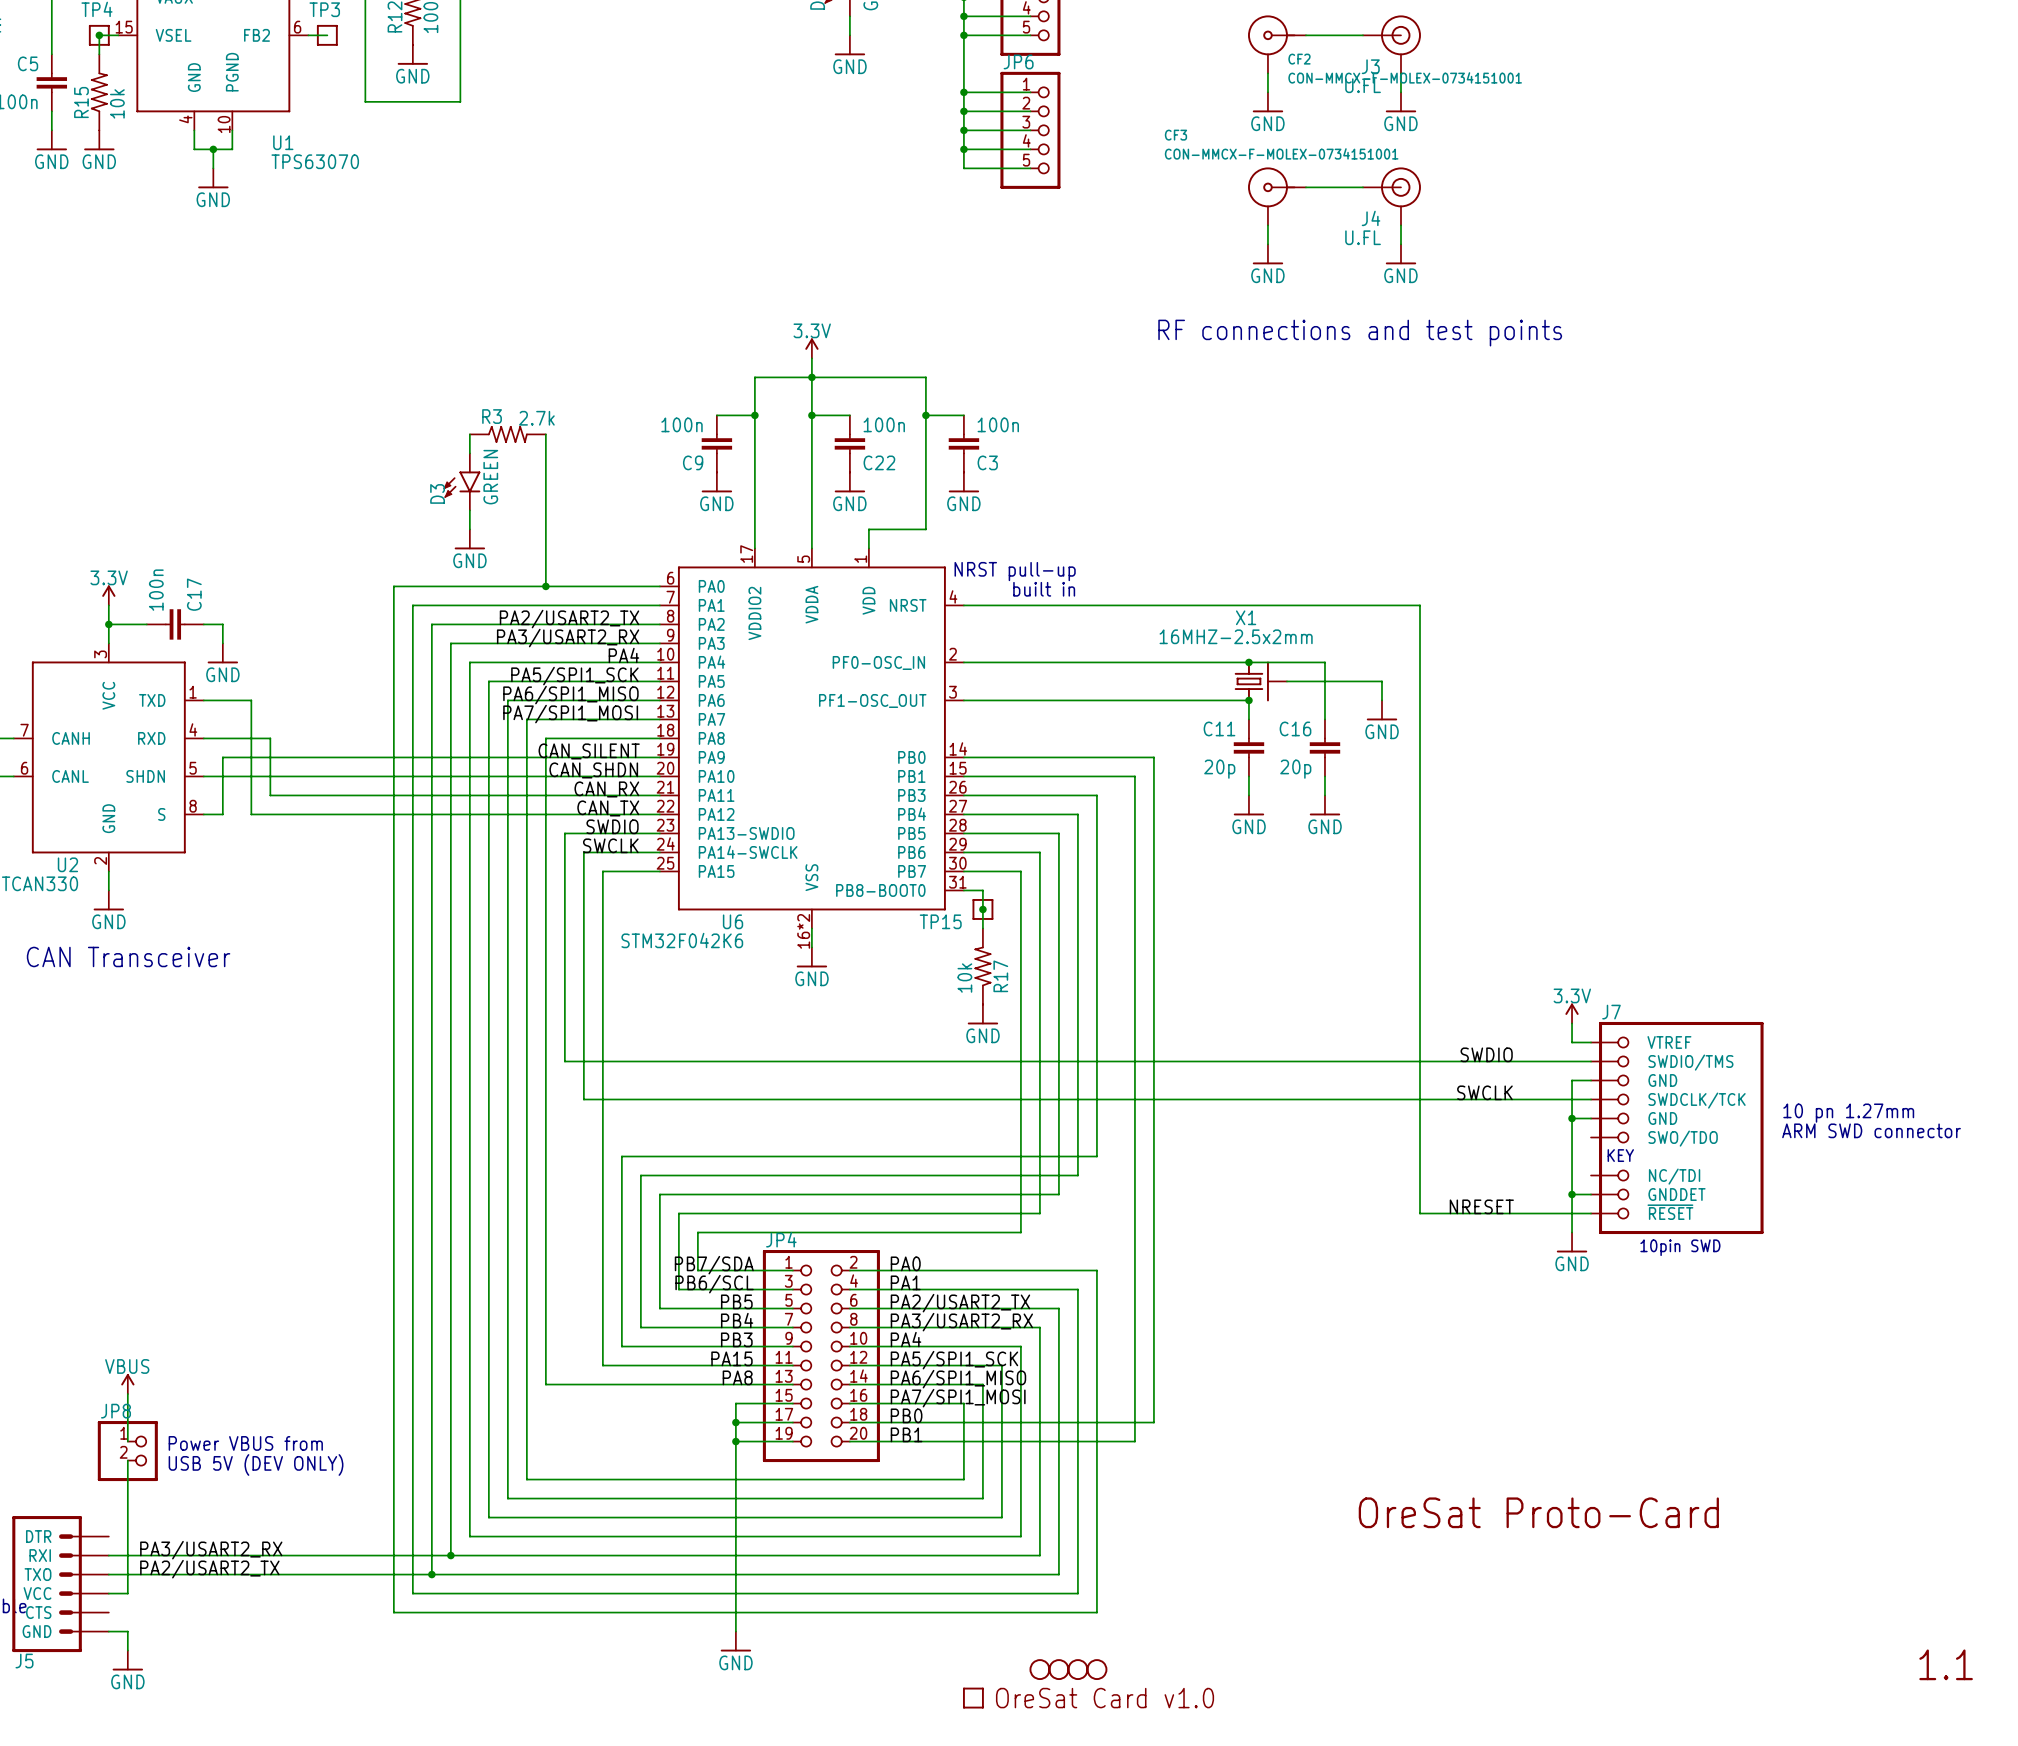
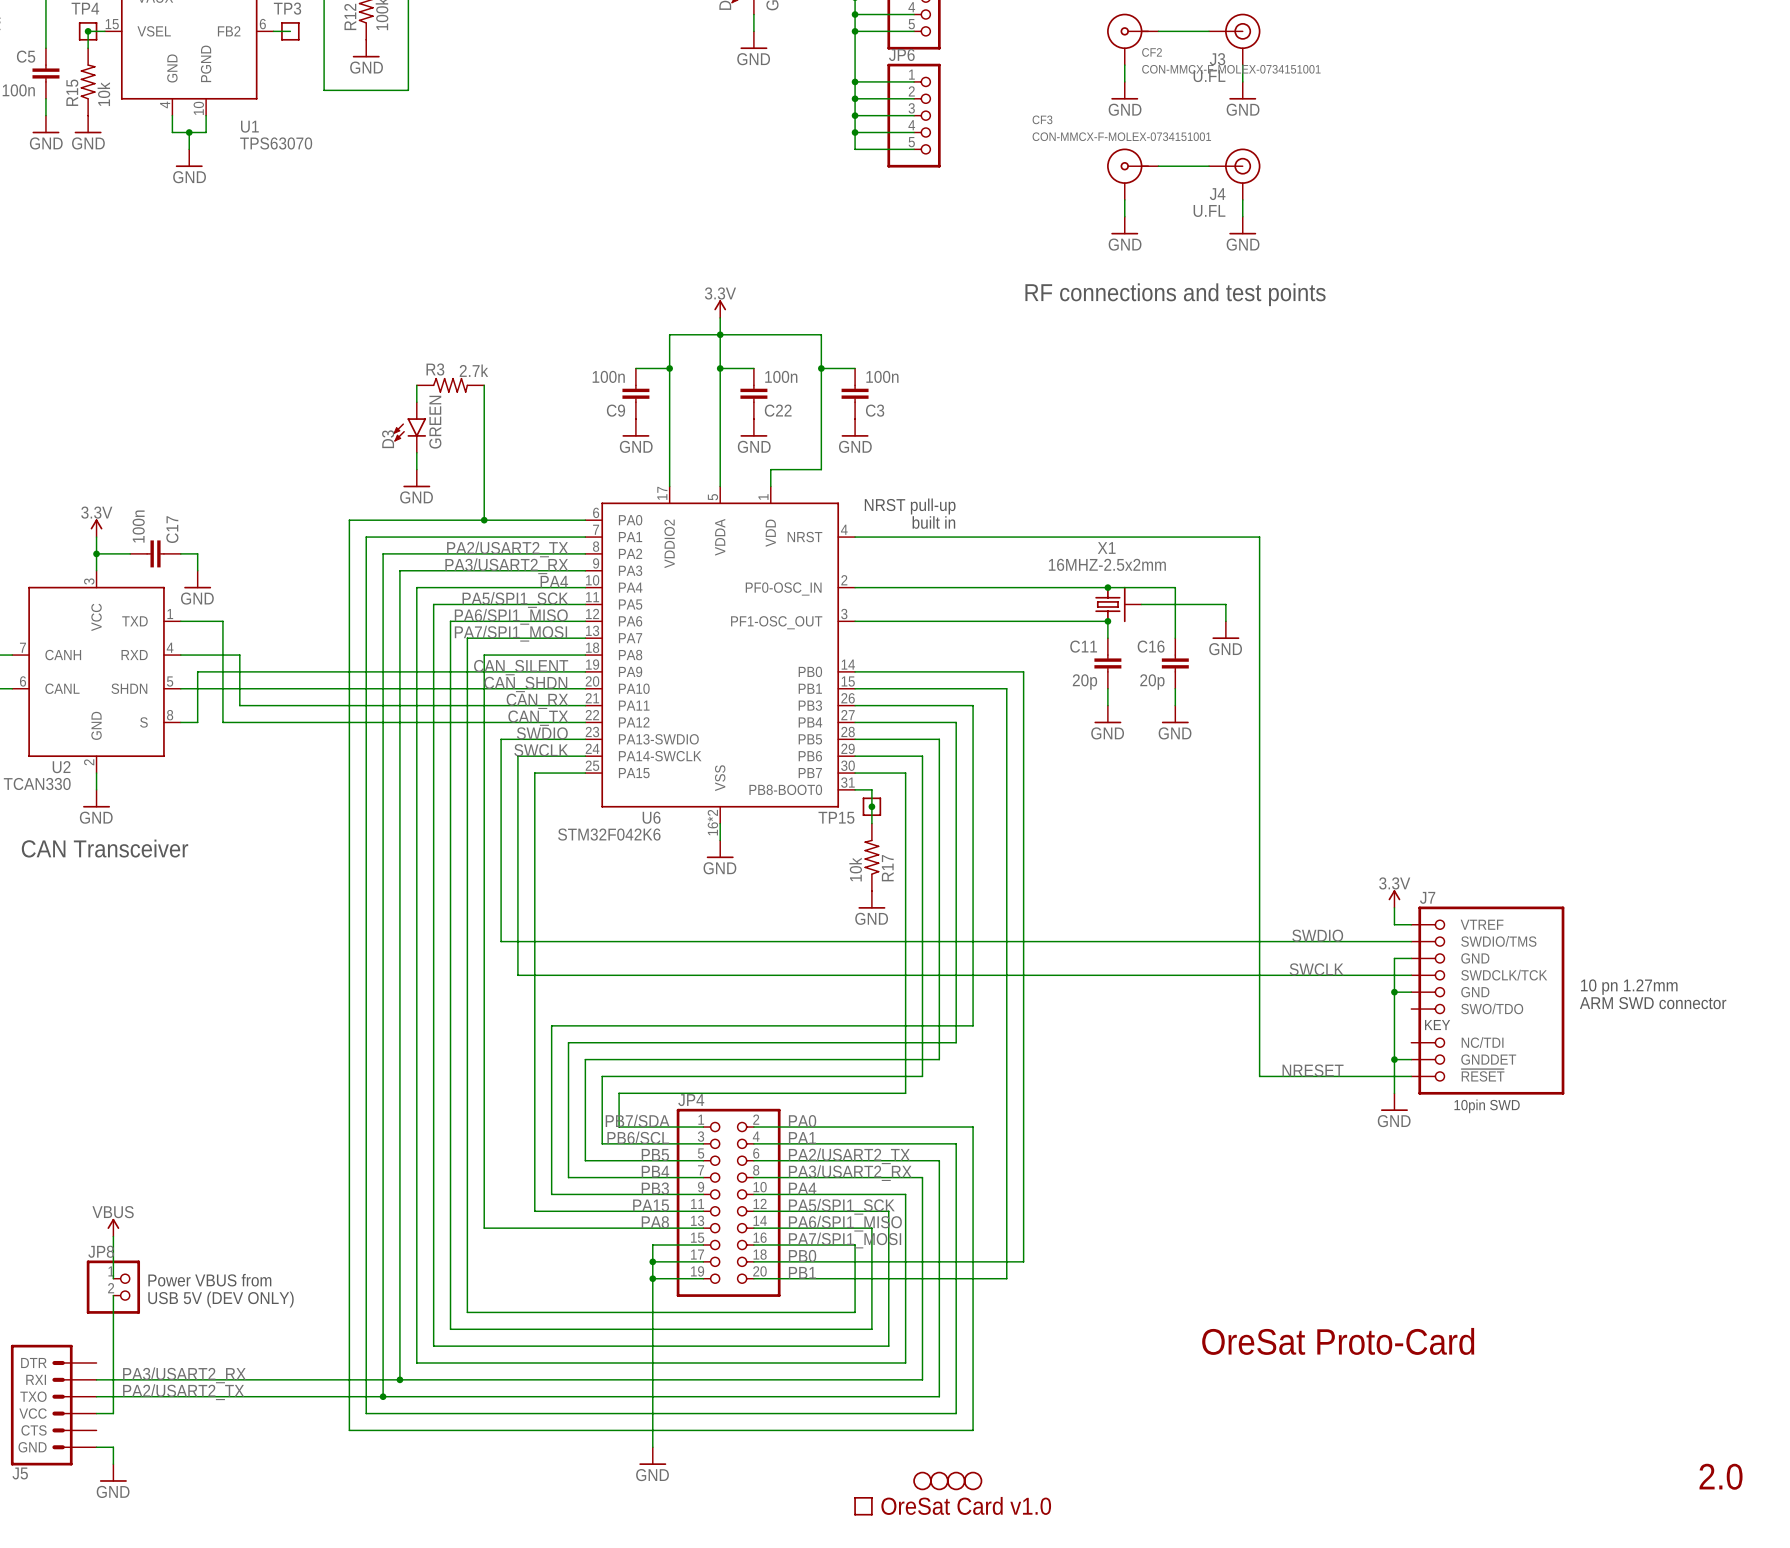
text: 1.1 (1946, 1664) -> 2.0 (1721, 1476)

